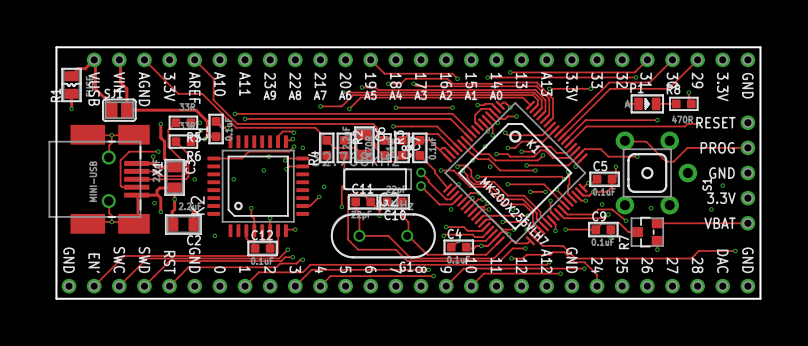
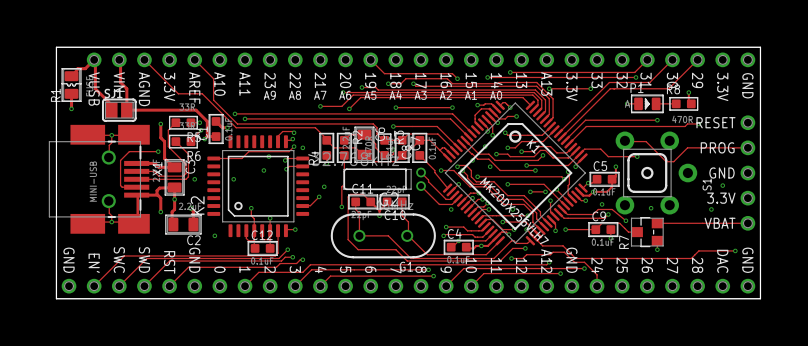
via: (153, 156) -> none
via: (154, 203) -> none

